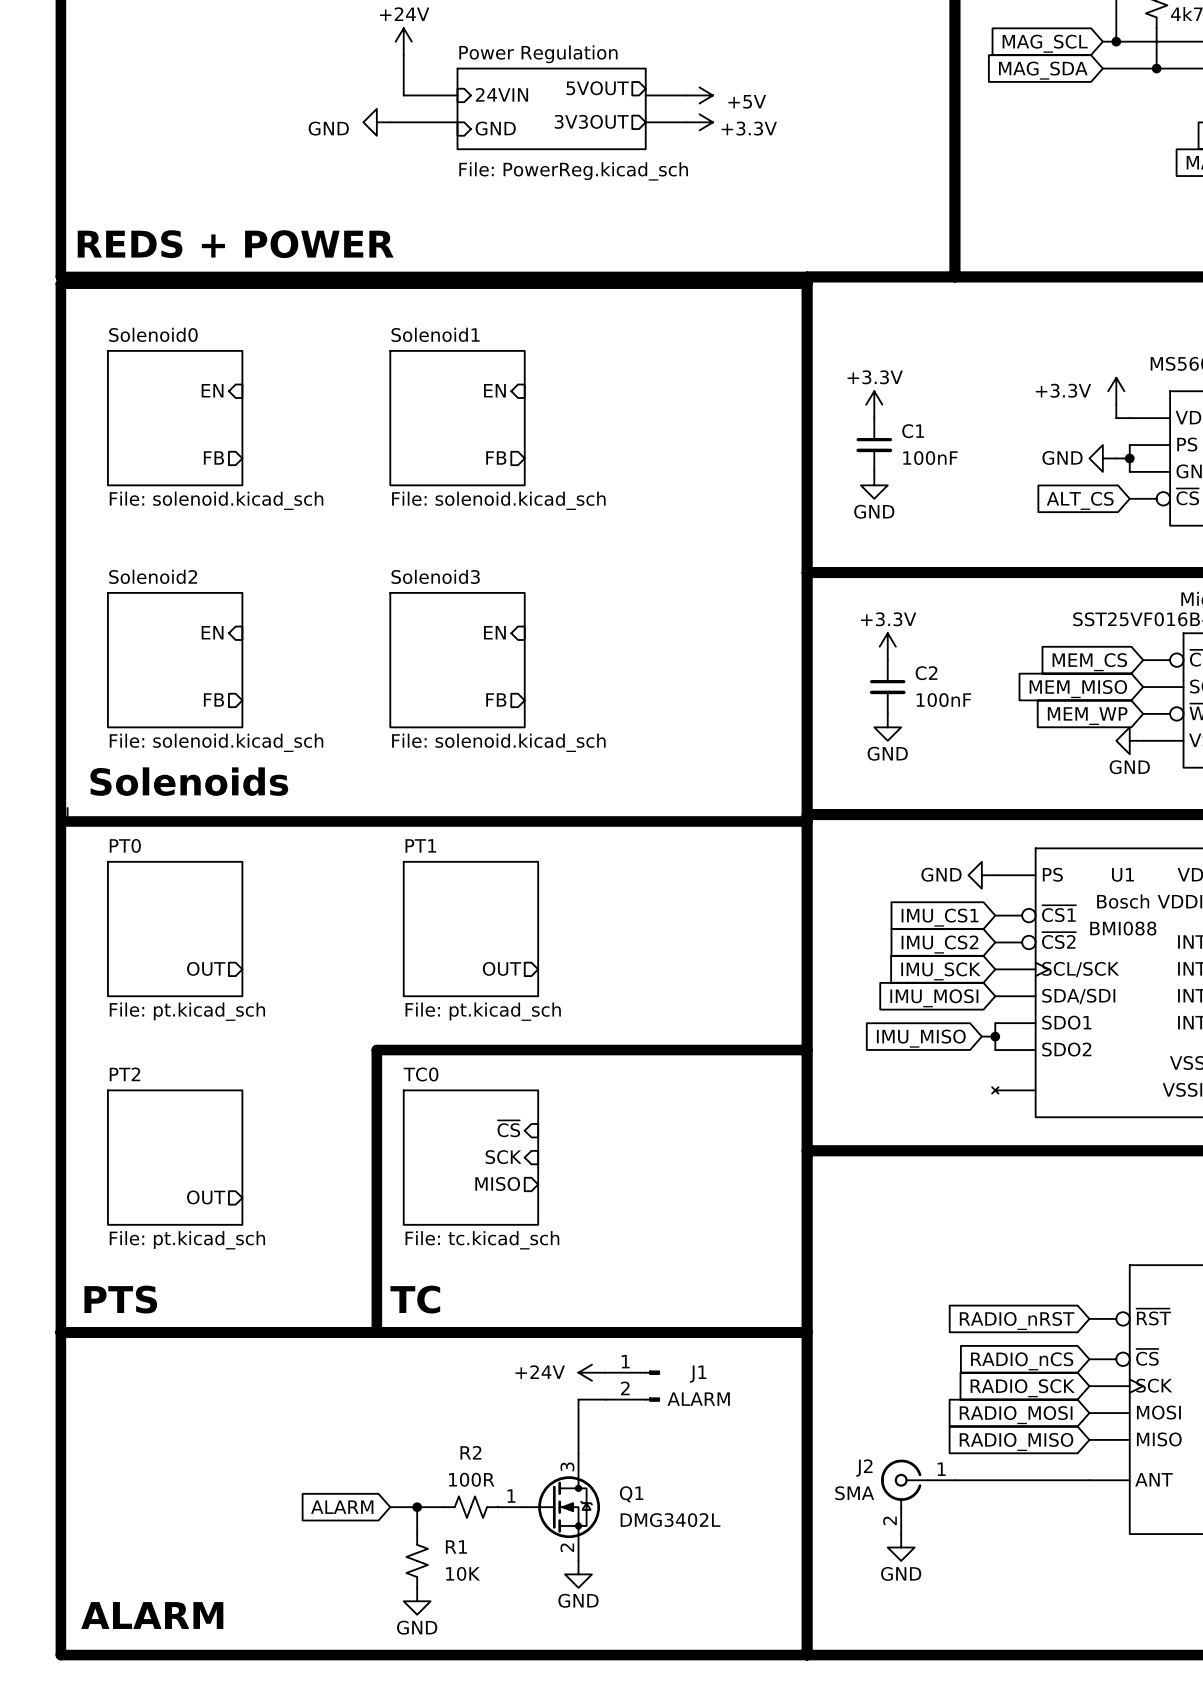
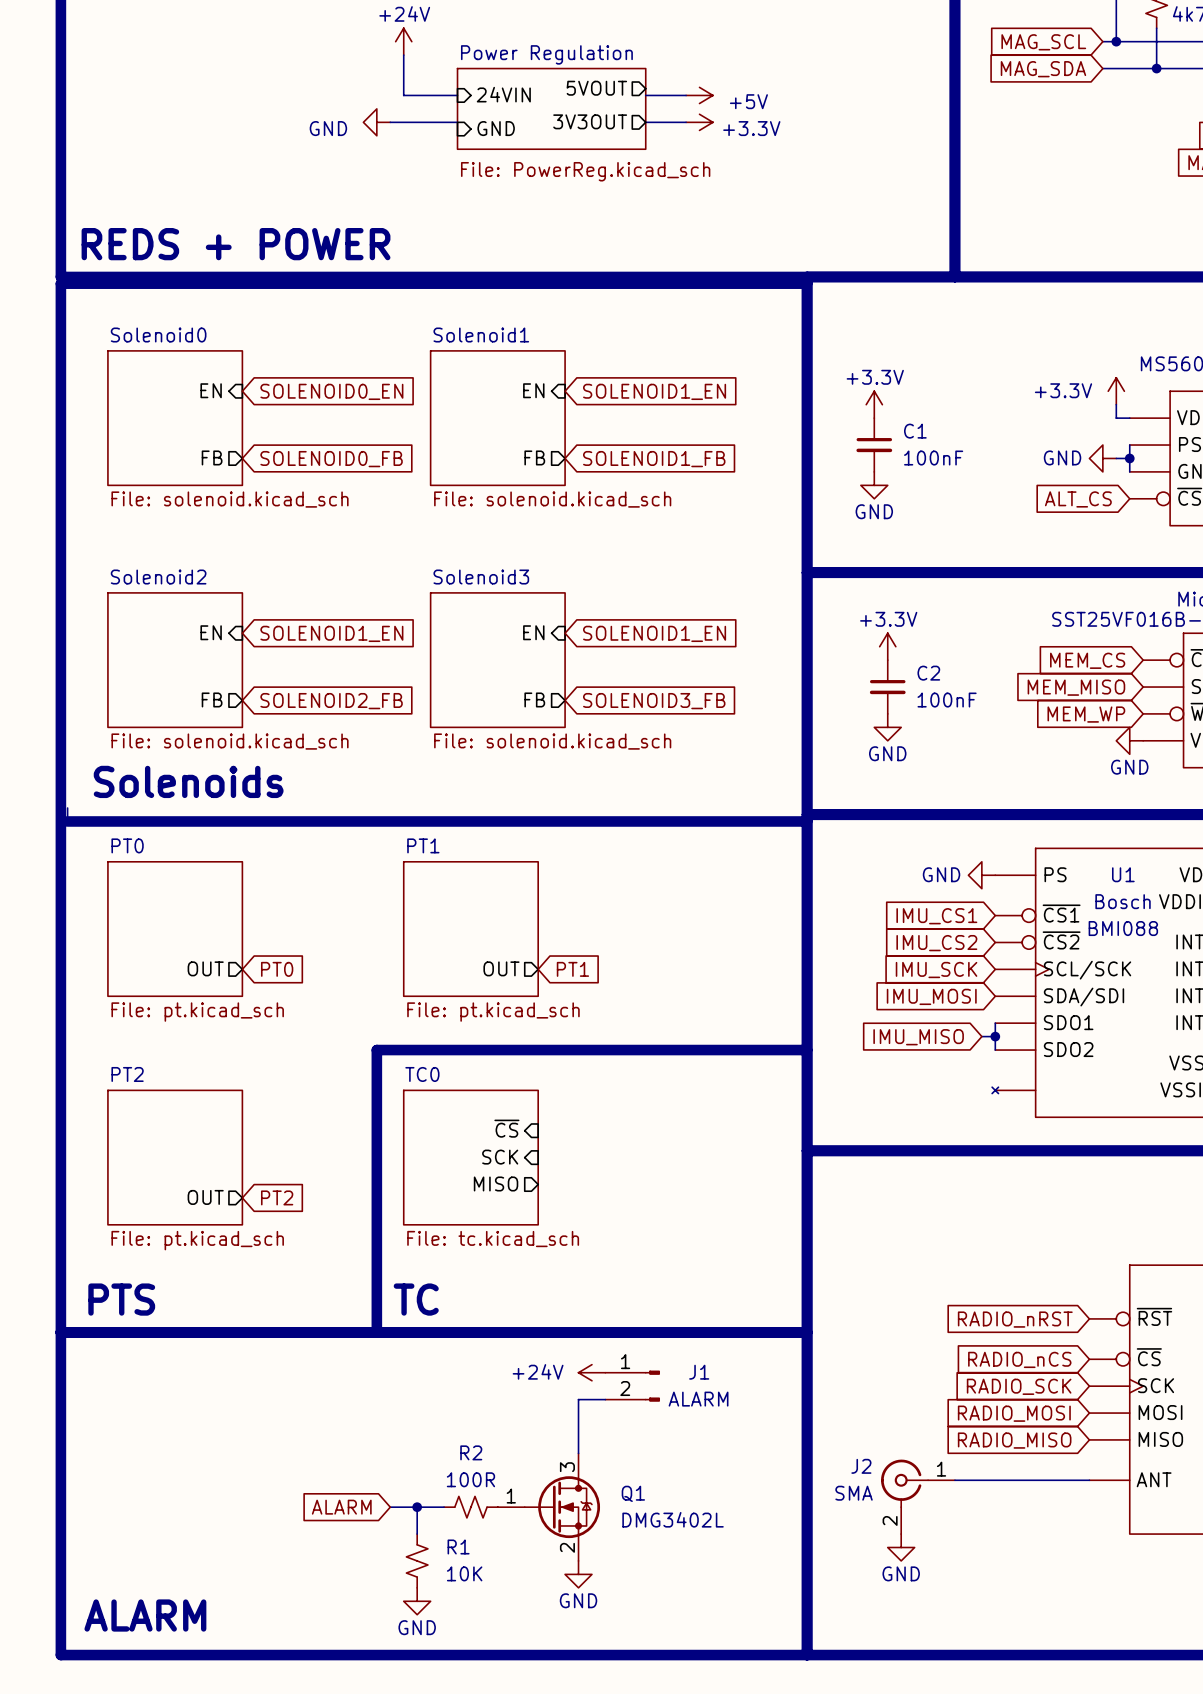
sheet pin position: EN (494, 390) -> EN (533, 390)
global label: none -> SOLENOID0_EN (331, 391)
global label: none -> SOLENOID1_EN (654, 391)
sheet Solenoid1 position: (457, 418) -> (497, 418)
sheet pin position: FB (496, 457) -> FB (534, 457)
global label: none -> SOLENOID0_FB (331, 459)
global label: none -> SOLENOID1_FB (654, 459)
sheet pin position: EN (494, 632) -> EN (533, 632)
global label: none -> SOLENOID1_EN (331, 633)
global label: none -> SOLENOID1_EN (654, 633)
sheet Solenoid3 position: (457, 660) -> (497, 660)
sheet pin position: FB (496, 699) -> FB (534, 699)
global label: none -> SOLENOID2_FB (331, 701)
global label: none -> SOLENOID3_FB (654, 701)
global label: none -> PT0 (277, 969)
global label: none -> PT1 (572, 969)
global label: none -> PT2 (277, 1197)

